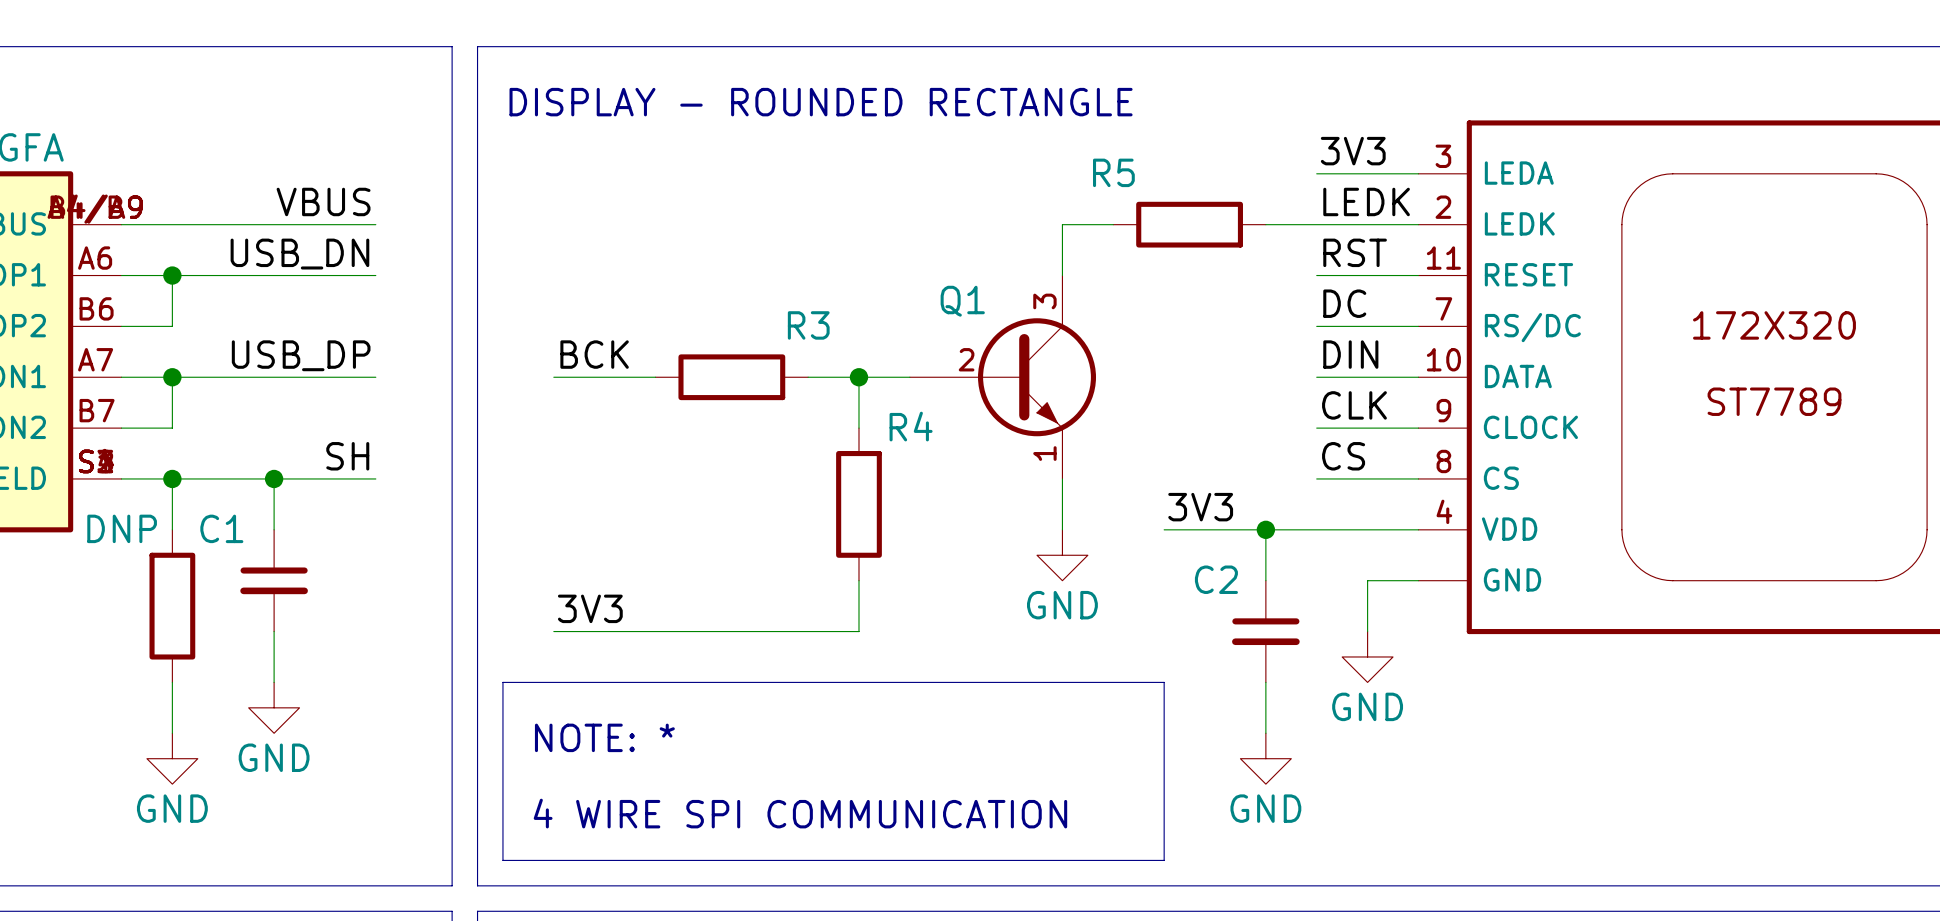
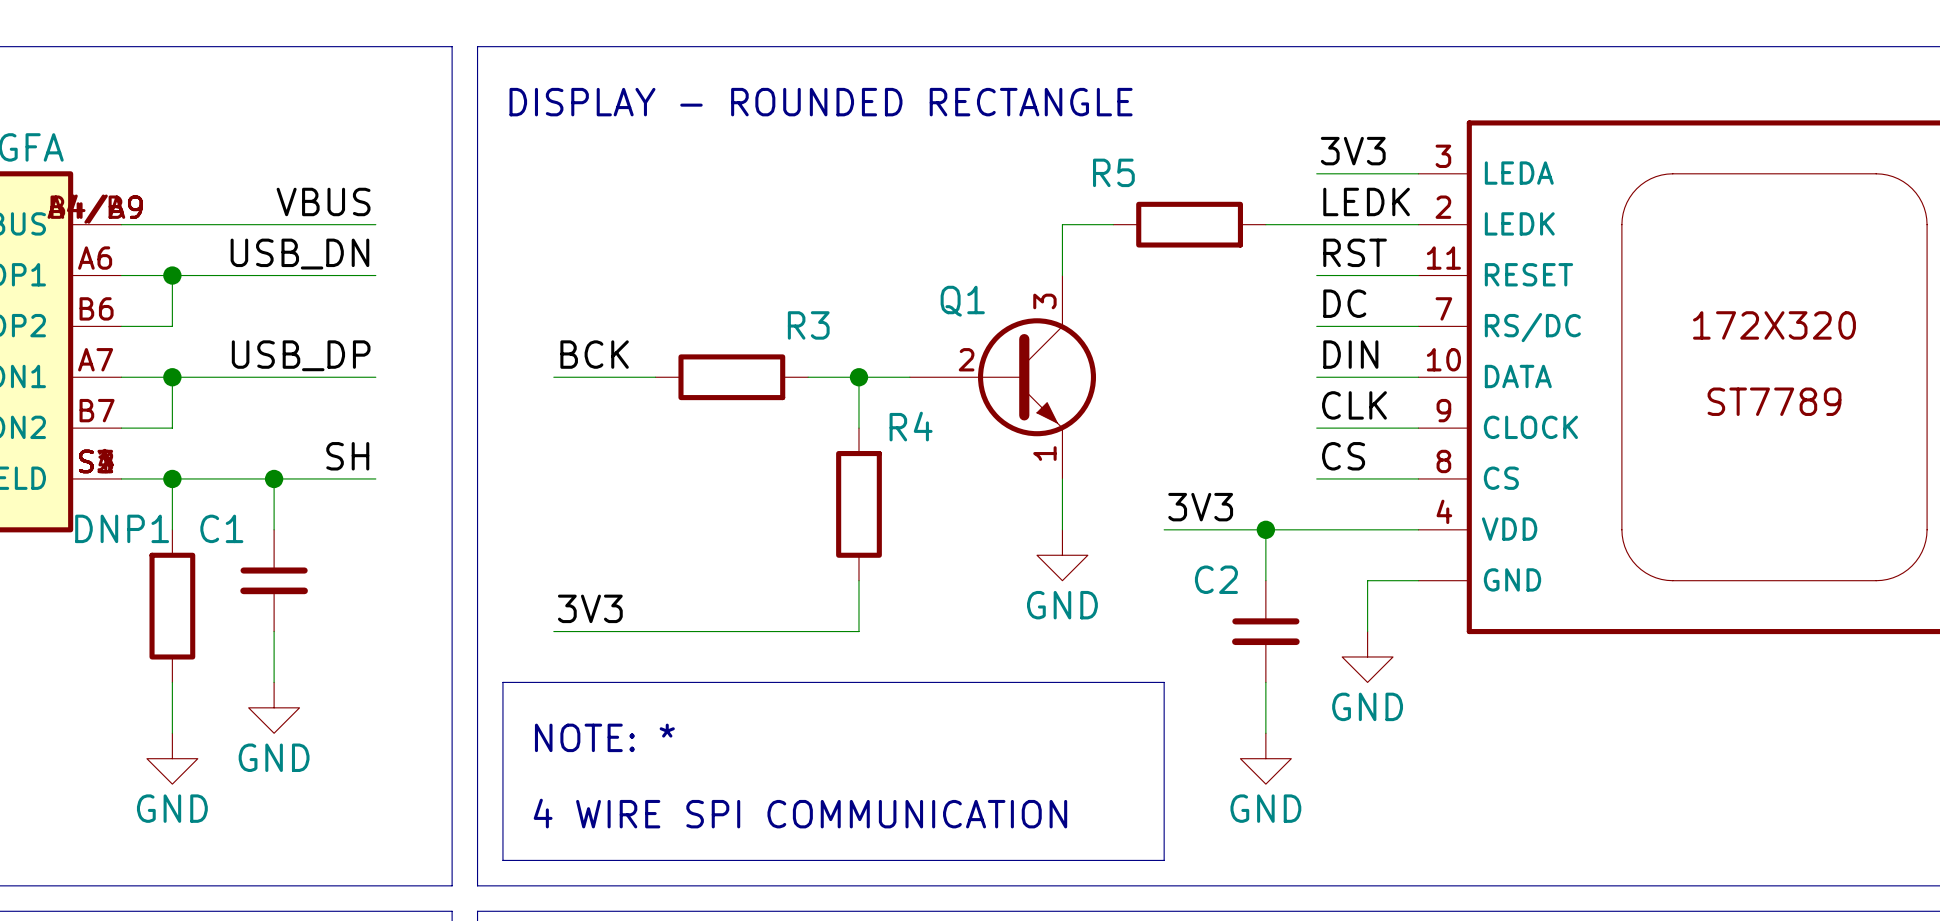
DNP name: DNP (122, 528) -> DNP1 (122, 528)

